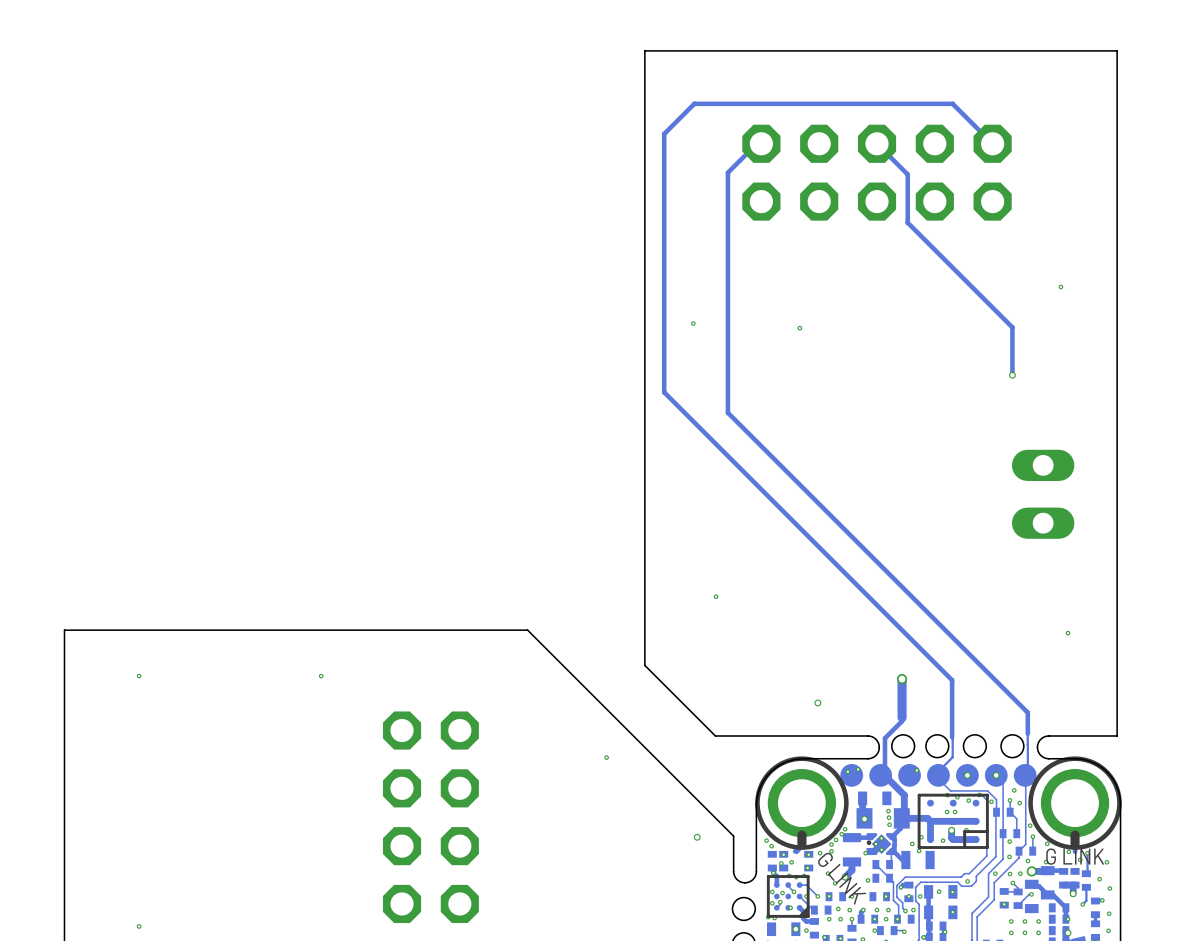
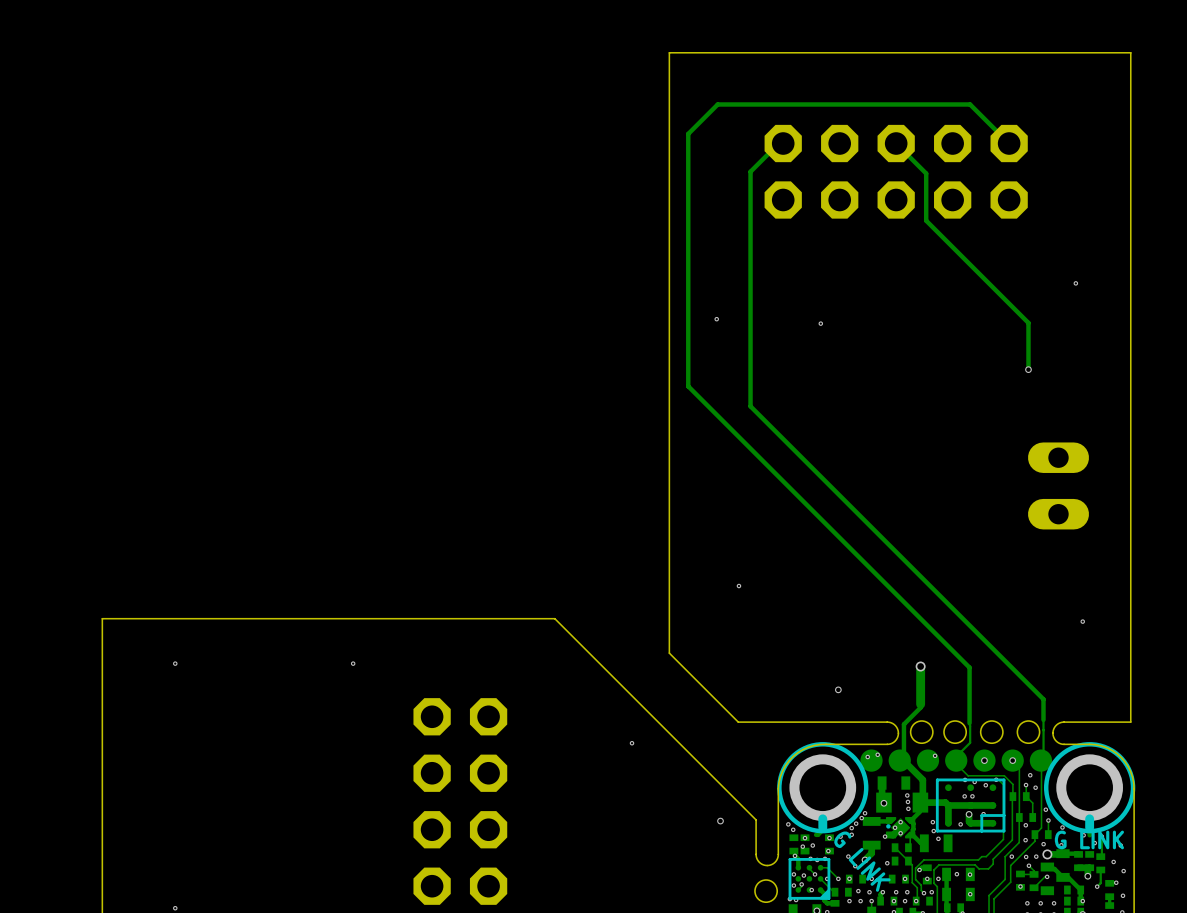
via: (991, 801) -> none
via: (921, 837) -> none
via: none -> (932, 822)
via: (912, 843) -> none
via: none -> (933, 831)
via: (919, 850) -> none
via: none -> (938, 838)
via: (967, 881) -> none

